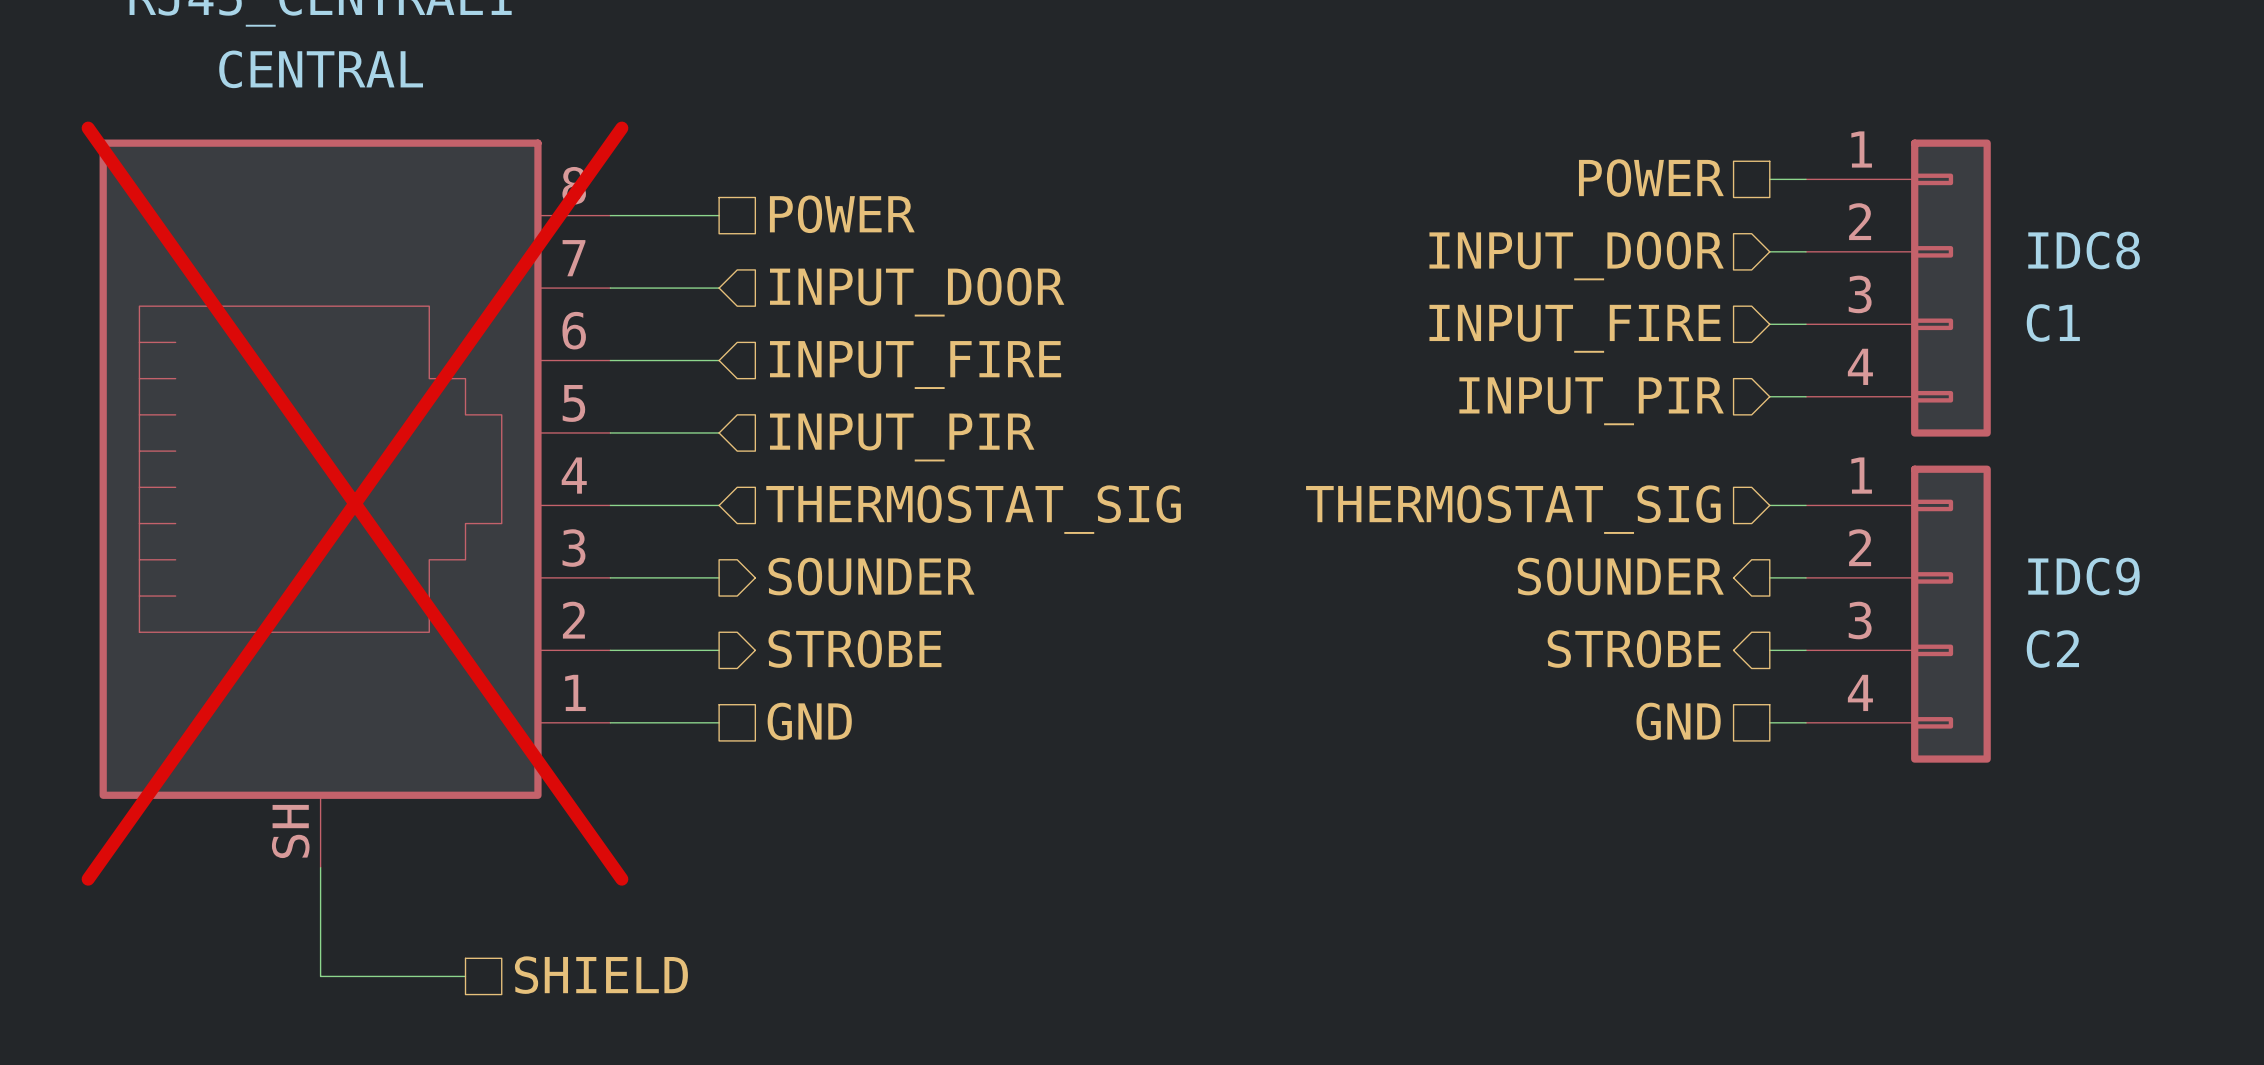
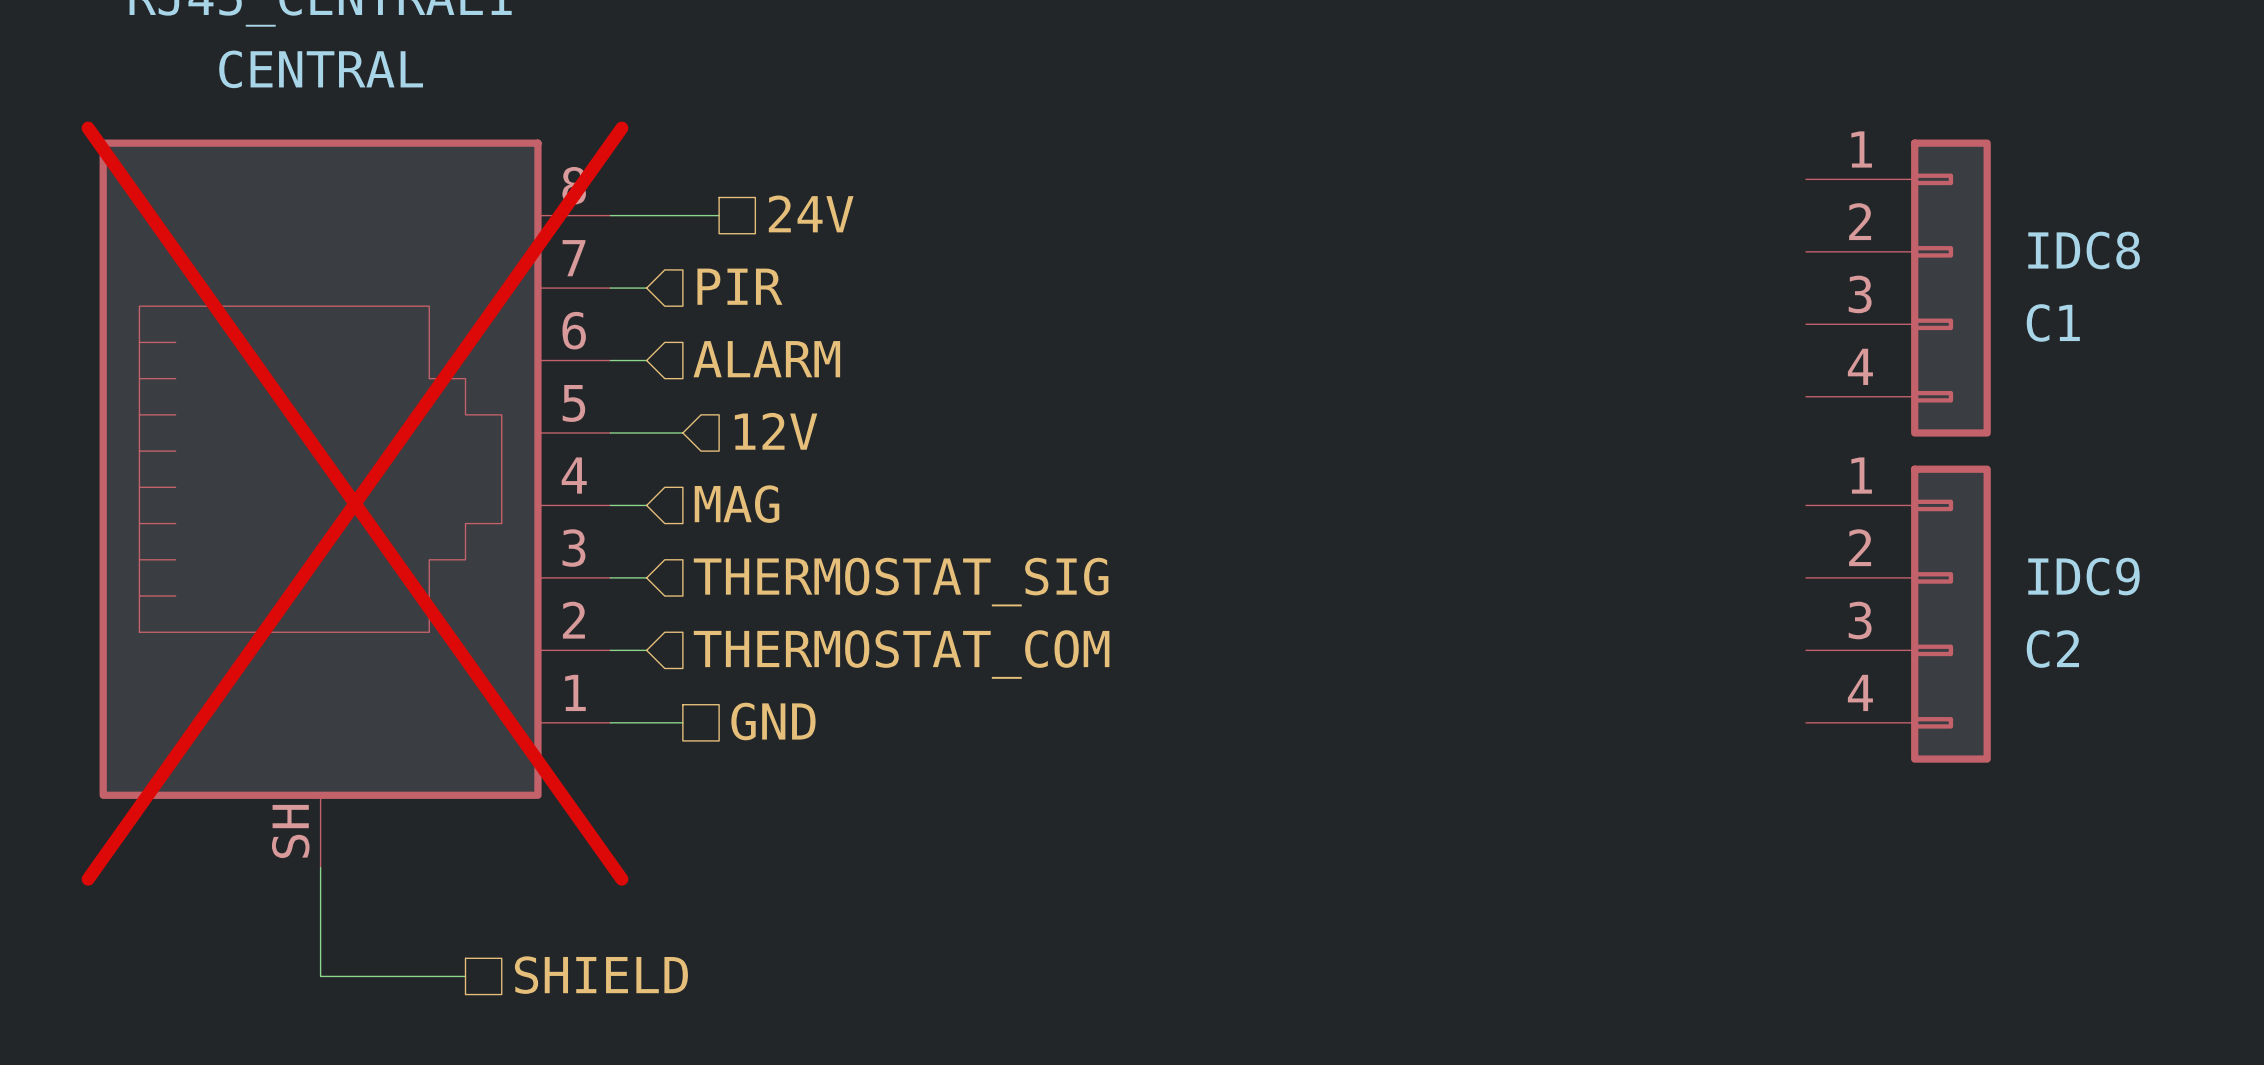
hierarchical label: POWER (1651, 178) -> none
wire: (1769, 179) (1806, 179) -> none
hierarchical label: POWER (842, 214) -> 24V (811, 213)
wire: (1769, 251) (1806, 251) -> none
hierarchical label: INPUT_DOOR (1576, 256) -> none
hierarchical label: none -> PIR (739, 286)
wire: (646, 288) (719, 288) -> none
hierarchical label: INPUT_DOOR (917, 292) -> none
wire: (1769, 324) (1806, 324) -> none
hierarchical label: INPUT_FIRE (1575, 328) -> none
hierarchical label: none -> ALARM (766, 359)
wire: (646, 360) (719, 360) -> none
hierarchical label: INPUT_FIRE (915, 365) -> none
wire: (1769, 396) (1806, 396) -> none
hierarchical label: INPUT_PIR (1591, 401) -> none
hierarchical label: none -> 12V (776, 431)
wire: (682, 432) (719, 432) -> none
hierarchical label: INPUT_PIR (902, 437) -> none
hierarchical label: none -> MAG (737, 504)
wire: (646, 505) (719, 505) -> none
wire: (1769, 505) (1806, 505) -> none
hierarchical label position: THERMOSTAT_SIG (973, 509) -> THERMOSTAT_SIG (901, 582)
hierarchical label: THERMOSTAT_SIG (1513, 509) -> none
hierarchical label: SOUNDER (871, 576) -> none
hierarchical label: SOUNDER (1620, 576) -> none
wire: (646, 577) (719, 577) -> none
wire: (1769, 577) (1806, 577) -> none
hierarchical label: STROBE (854, 649) -> none
hierarchical label: STROBE (1634, 649) -> none
wire: (646, 650) (719, 650) -> none
wire: (1769, 650) (1806, 650) -> none
hierarchical label: none -> THERMOSTAT_COM (901, 654)
hierarchical label position: GND (809, 721) -> GND (773, 721)
hierarchical label: GND (1678, 721) -> none
wire: (682, 722) (719, 722) -> none
wire: (1769, 722) (1806, 722) -> none

